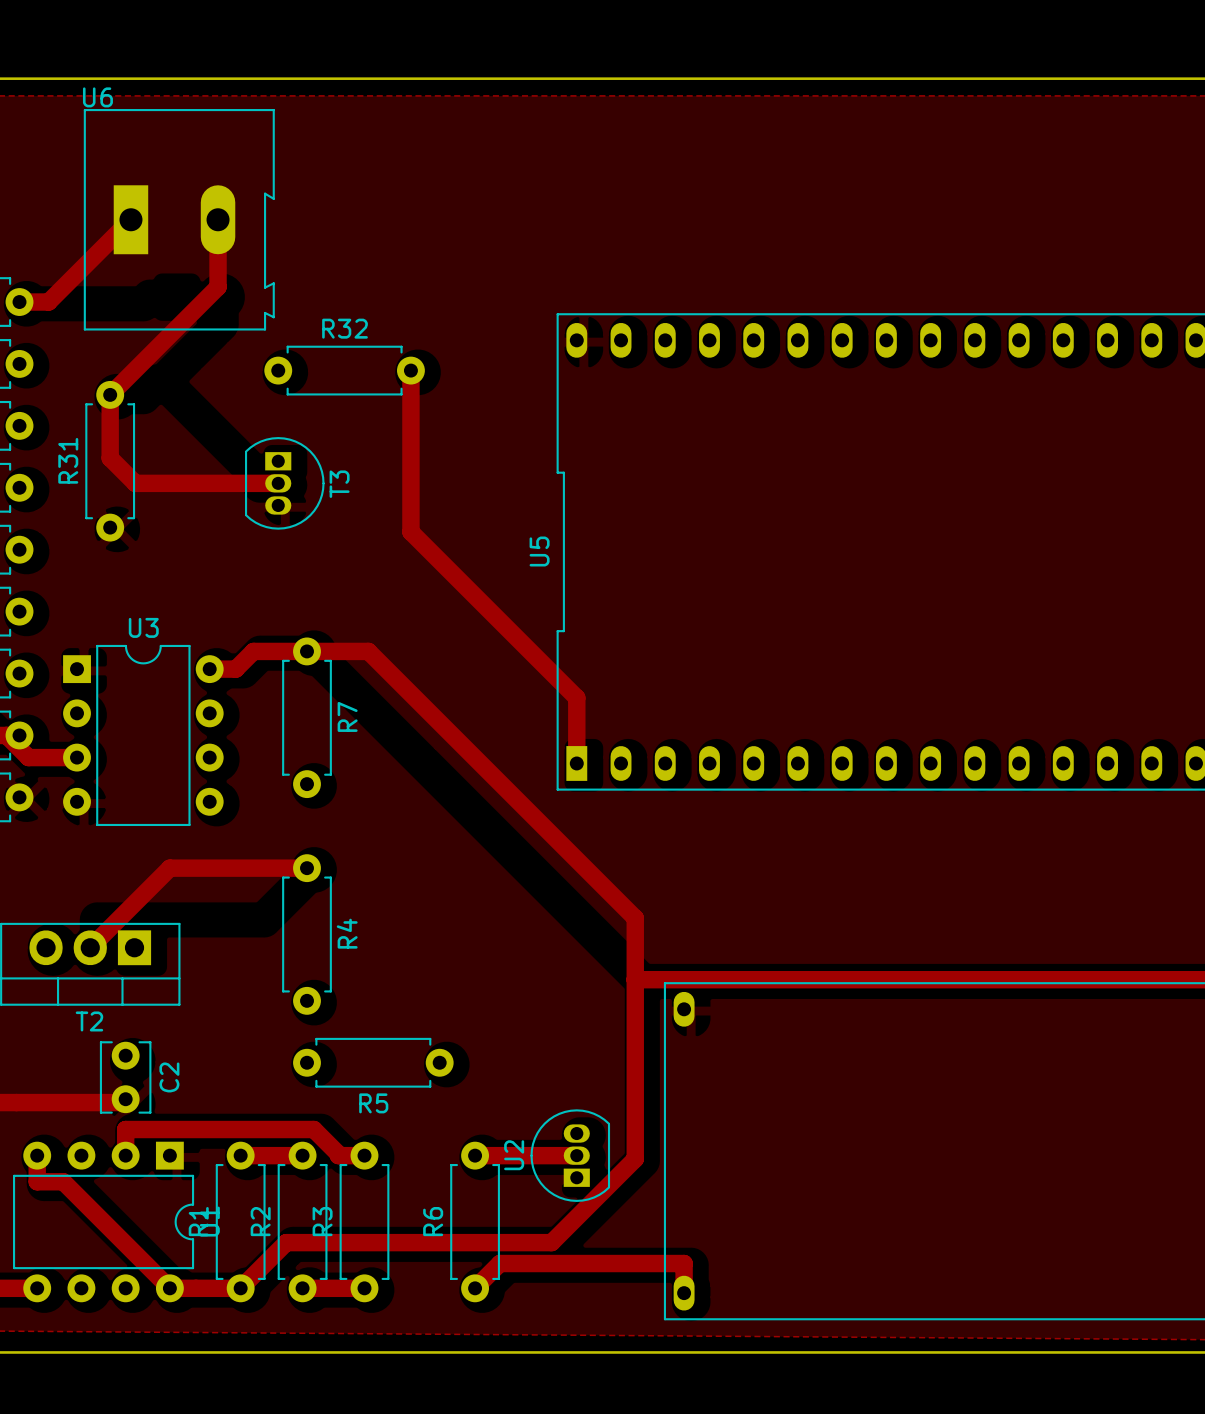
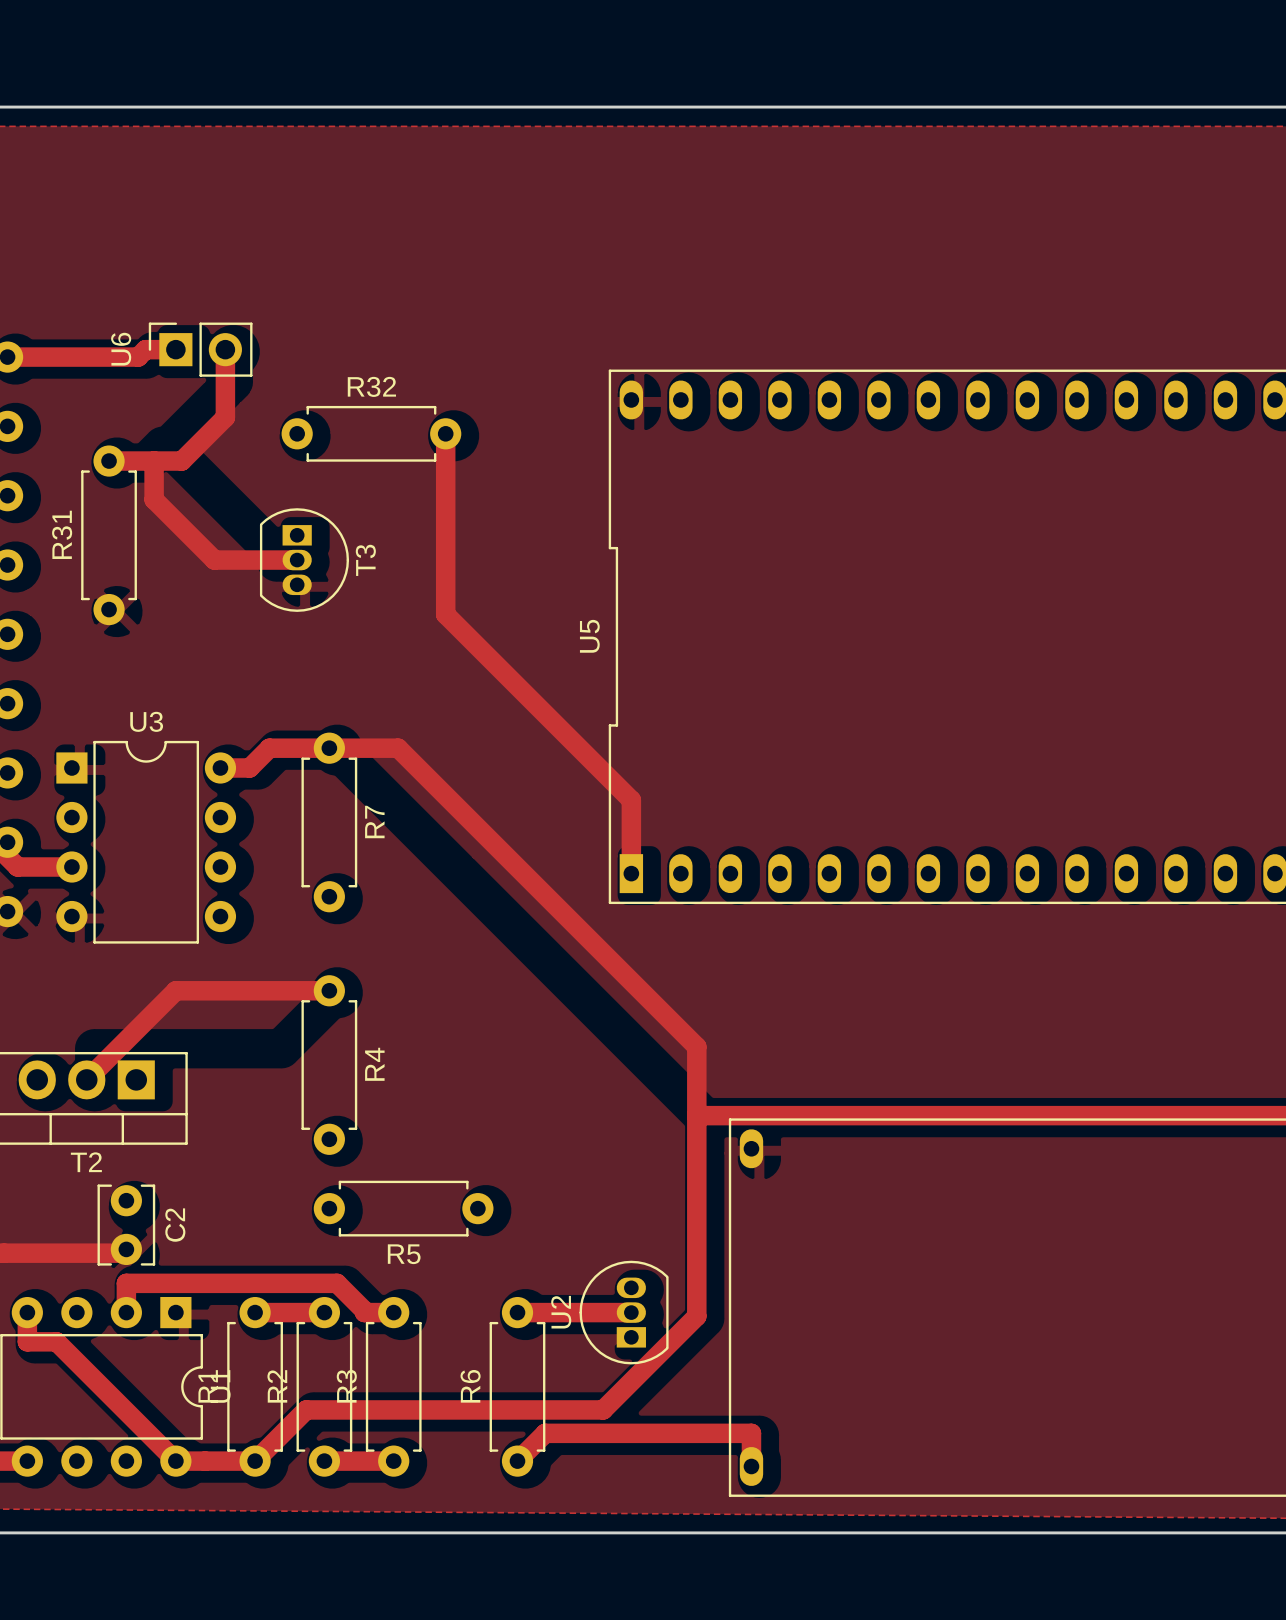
U6 name position: U6 (97, 97) -> U6 (121, 349)
U6 footprint: [83, 109, 275, 331] -> [148, 322, 253, 377]
track: (130, 219) (48, 302) -> (175, 349) (145, 349) (138, 357) (40, 357)
track: (218, 219) (218, 287) (110, 394) (110, 458) (135, 483) (204, 483) -> (154, 461) (154, 499) (214, 560)
track: none -> (225, 349) (225, 417) (181, 461) (109, 461)

